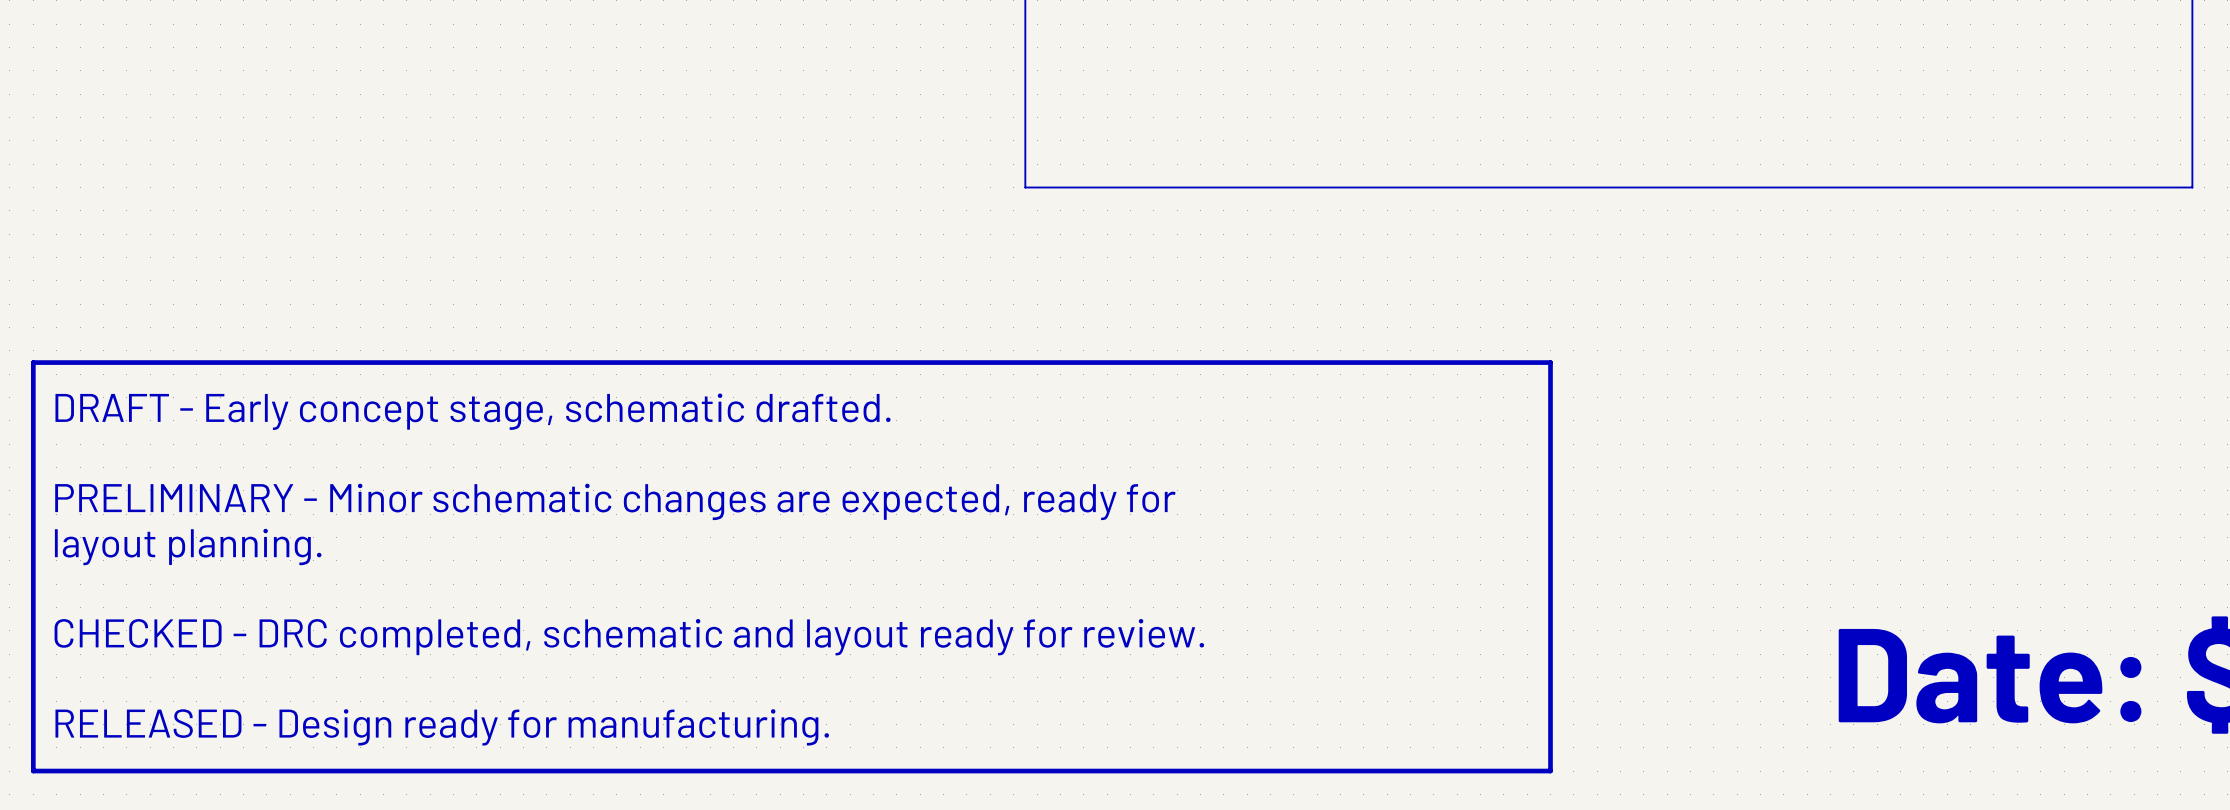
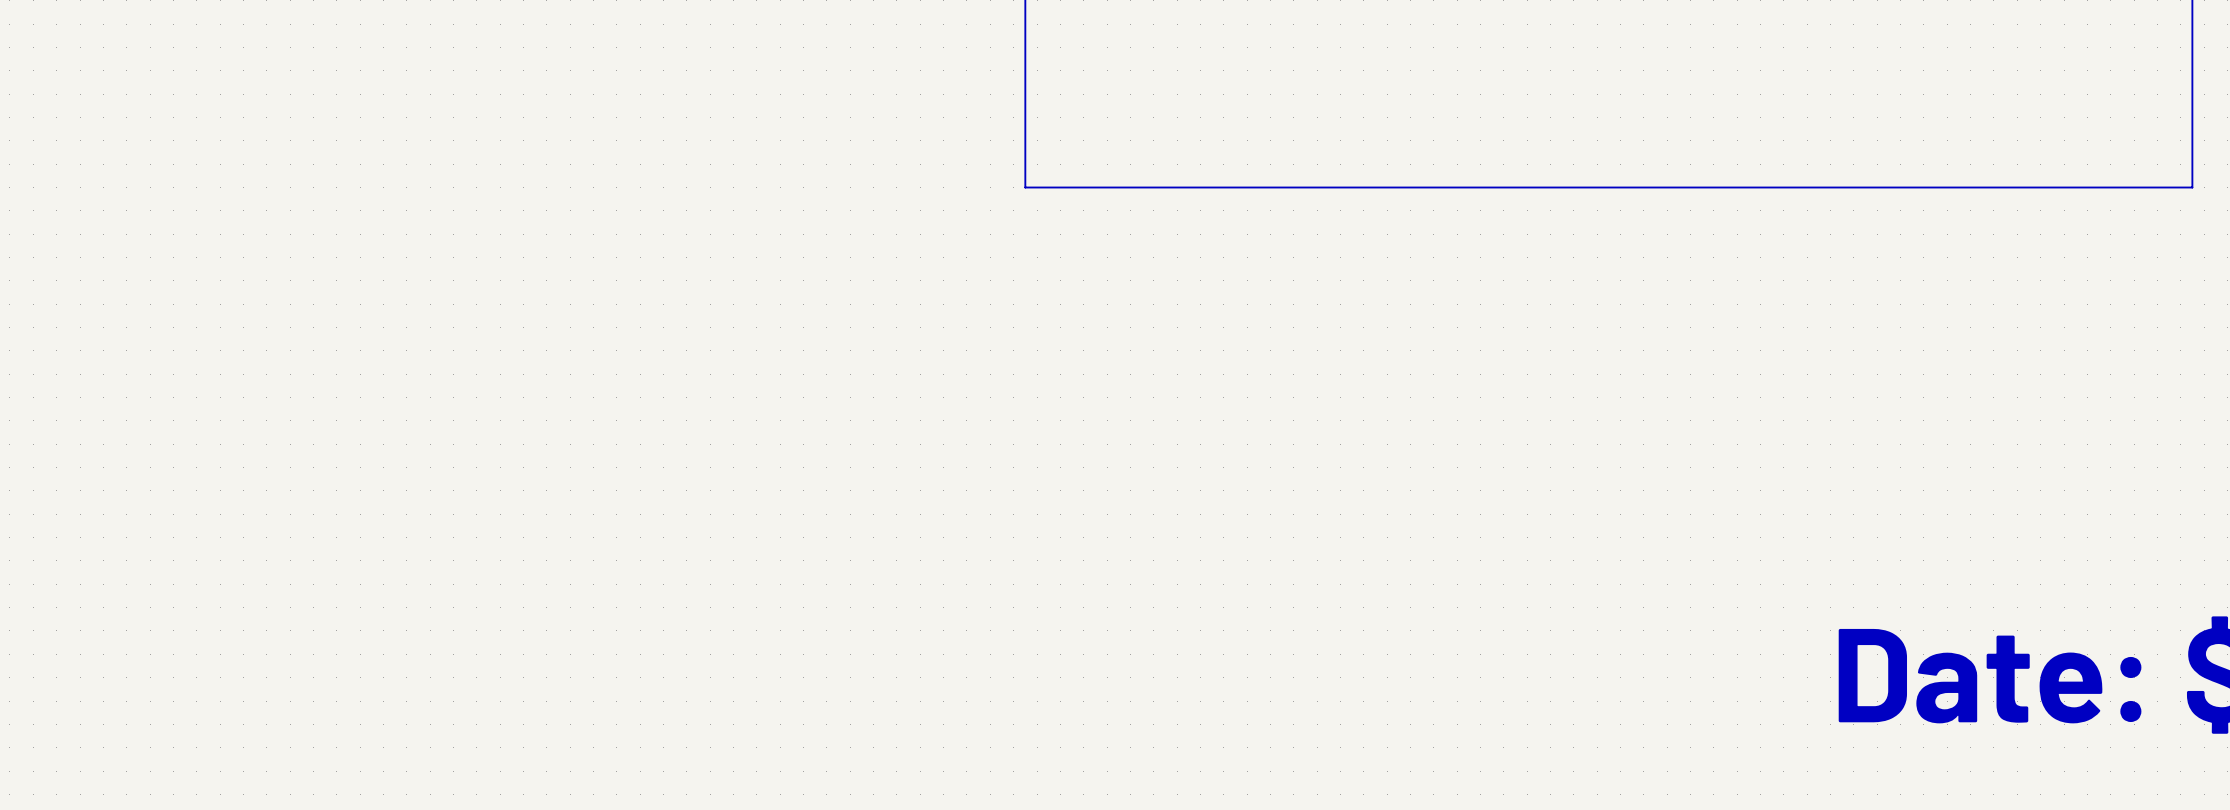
line: (33, 362) (1550, 362) (1550, 771) (33, 771) (33, 362) -> none
text: DRAFT - Early concept stage, schematic drafted. (473, 411) -> none
text: PRELIMINARY - Minor schematic changes are expected, ready for (615, 501) -> none
text: layout planning. (188, 547) -> none
text: CHECKED - DRC completed, schematic and layout ready for review. (629, 637) -> none
text: RELEASED - Design ready for manufacturing. (442, 727) -> none

